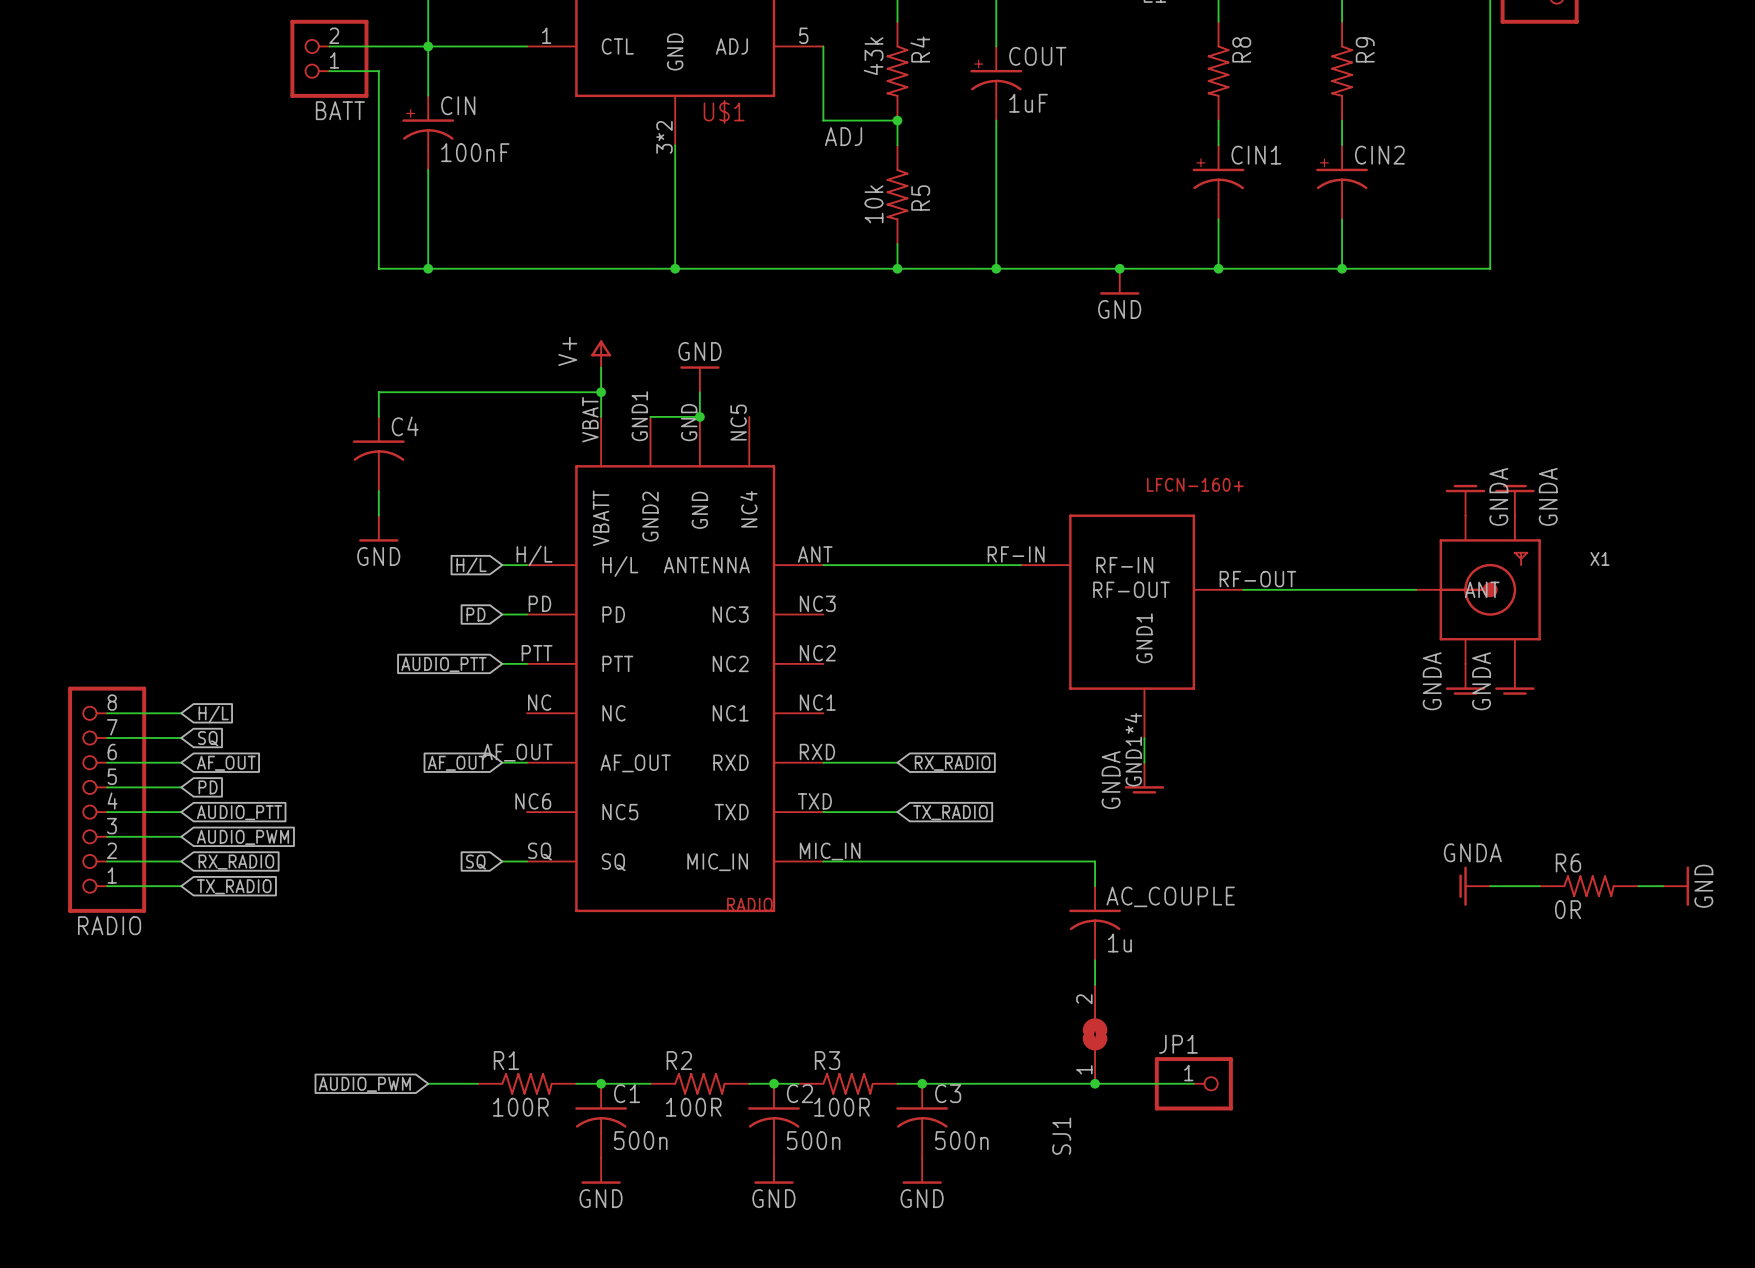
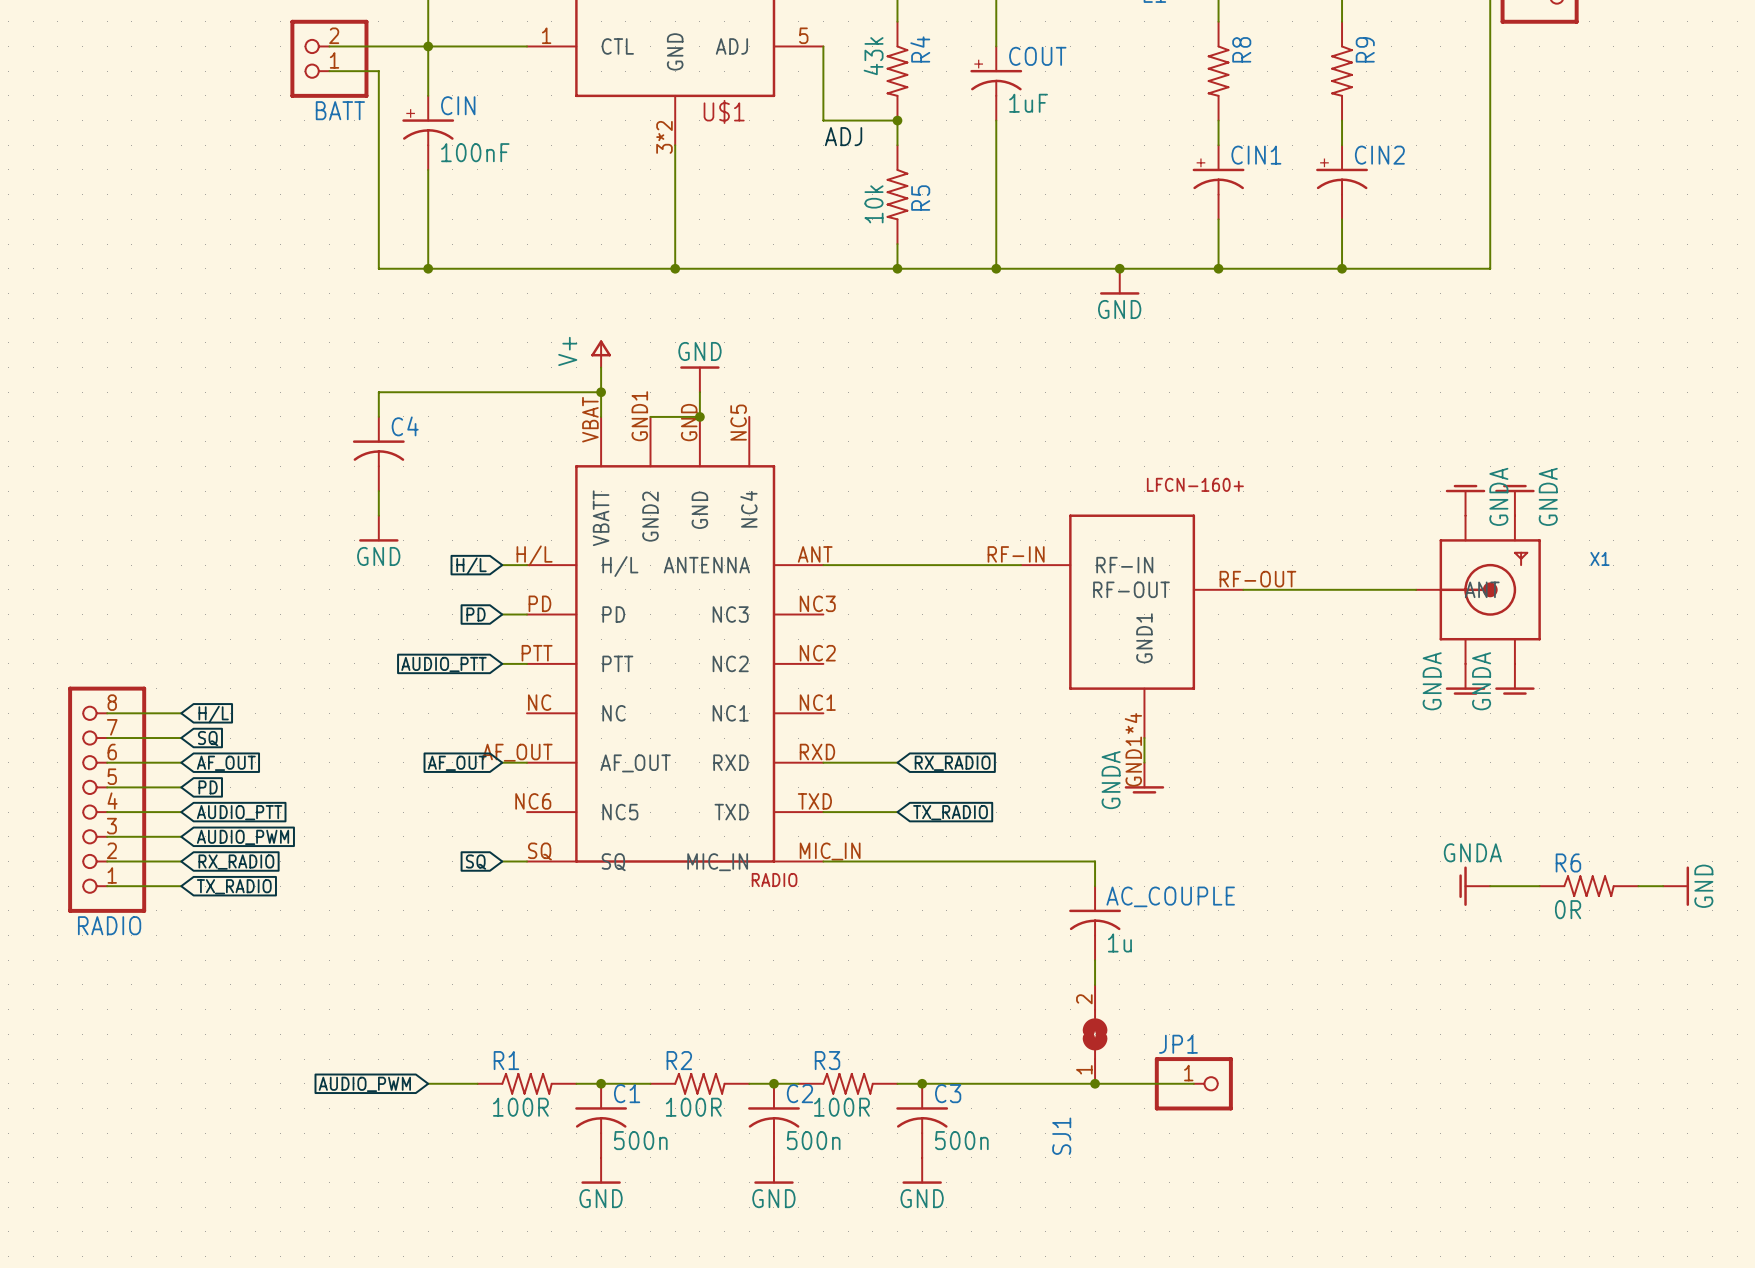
part: none -> (675, 639)
part: (675, 664) -> none

